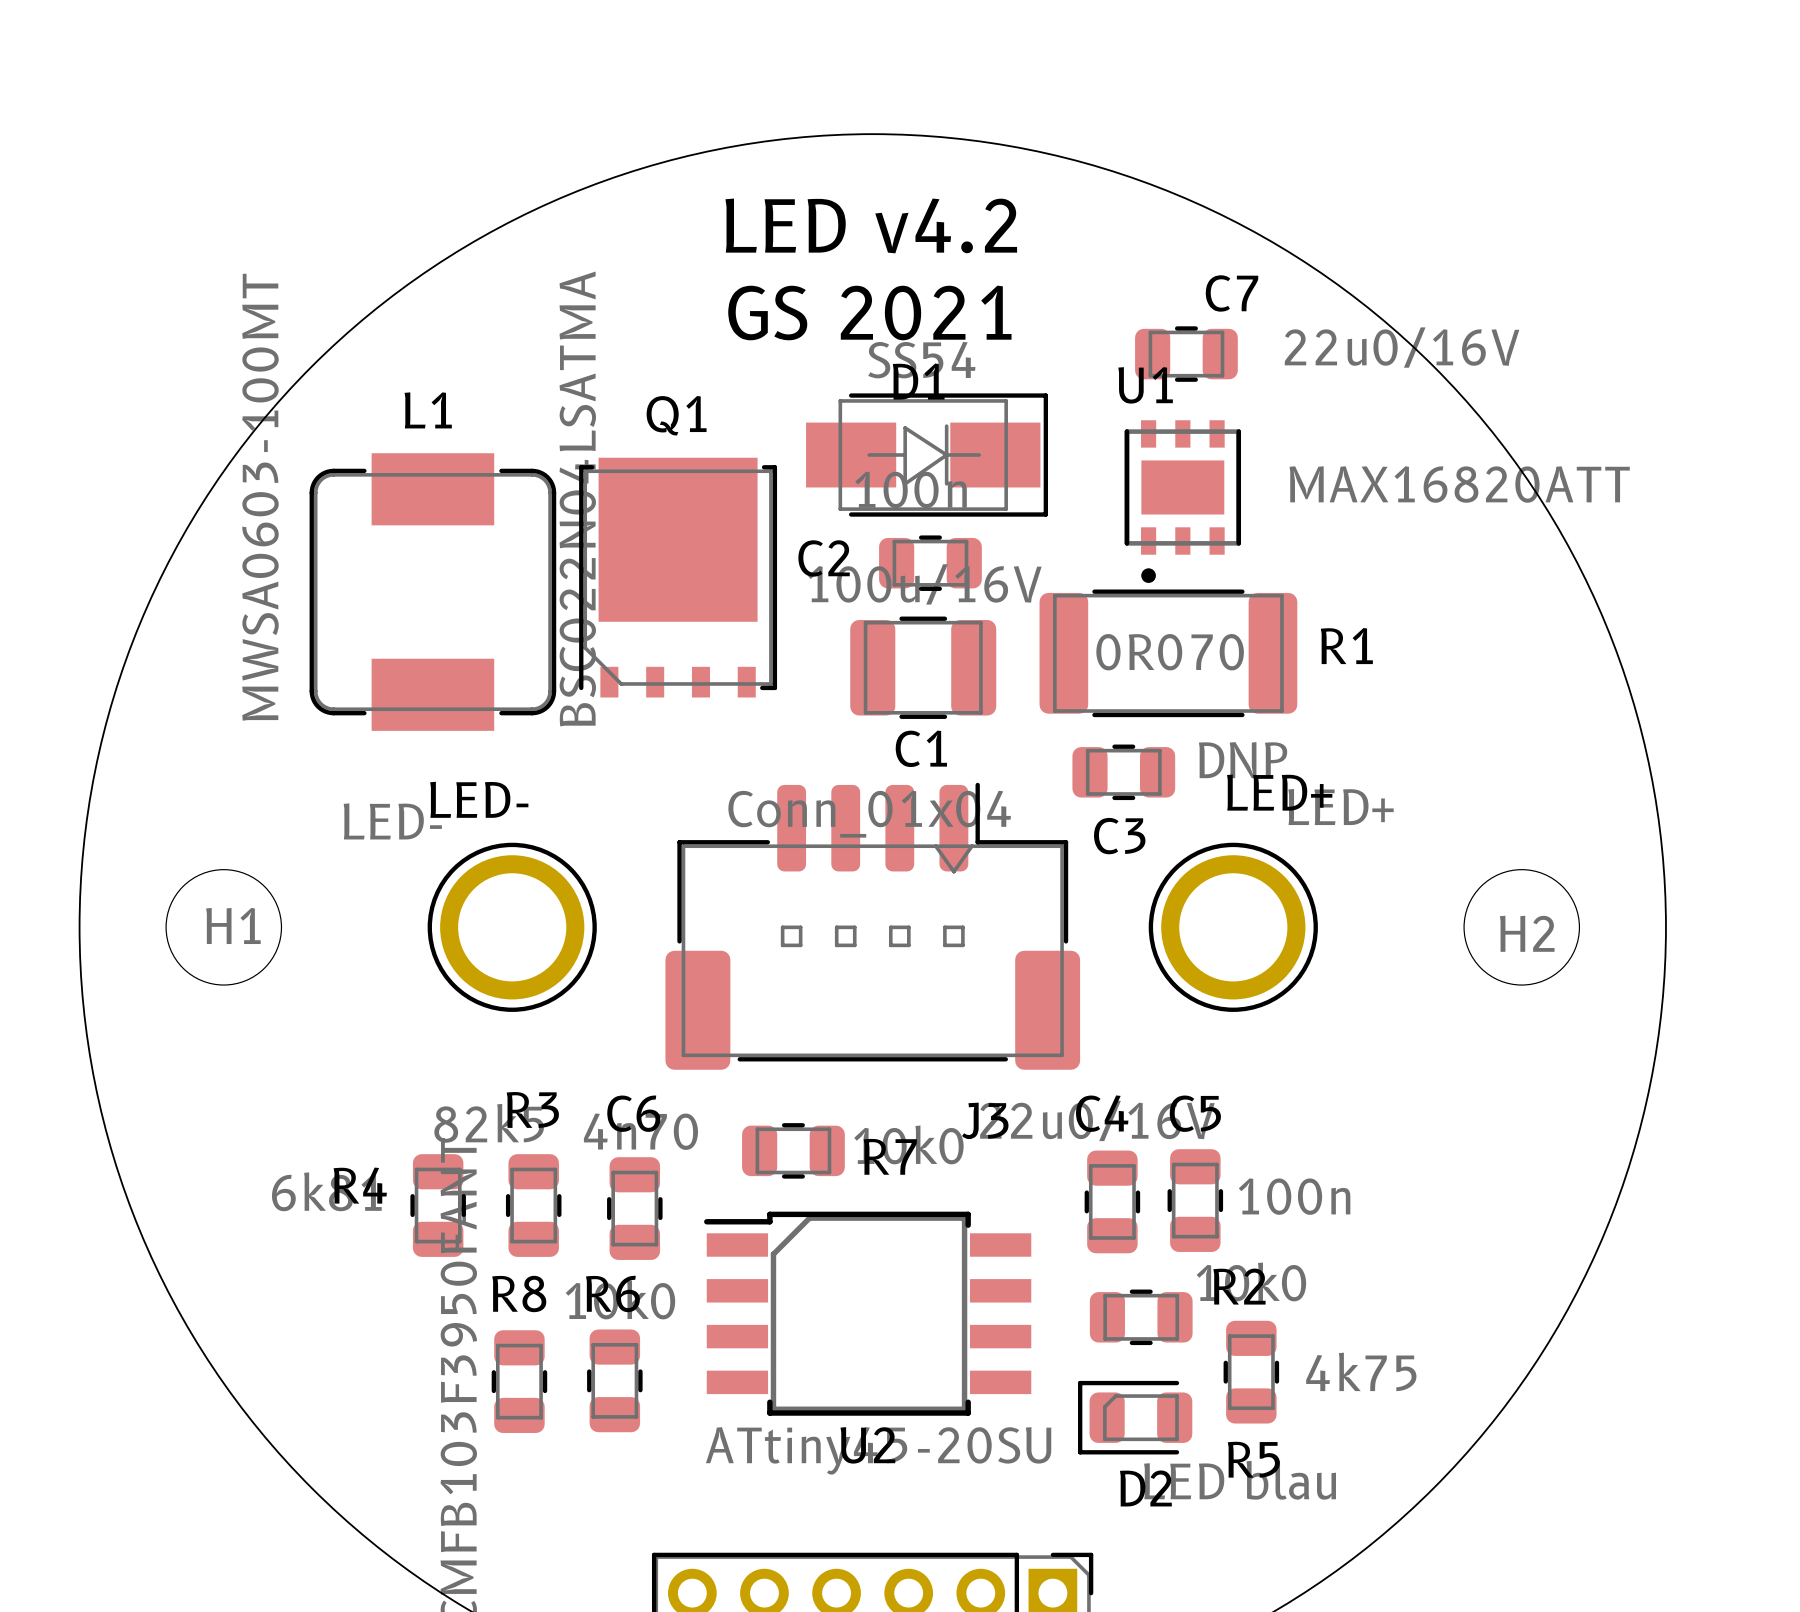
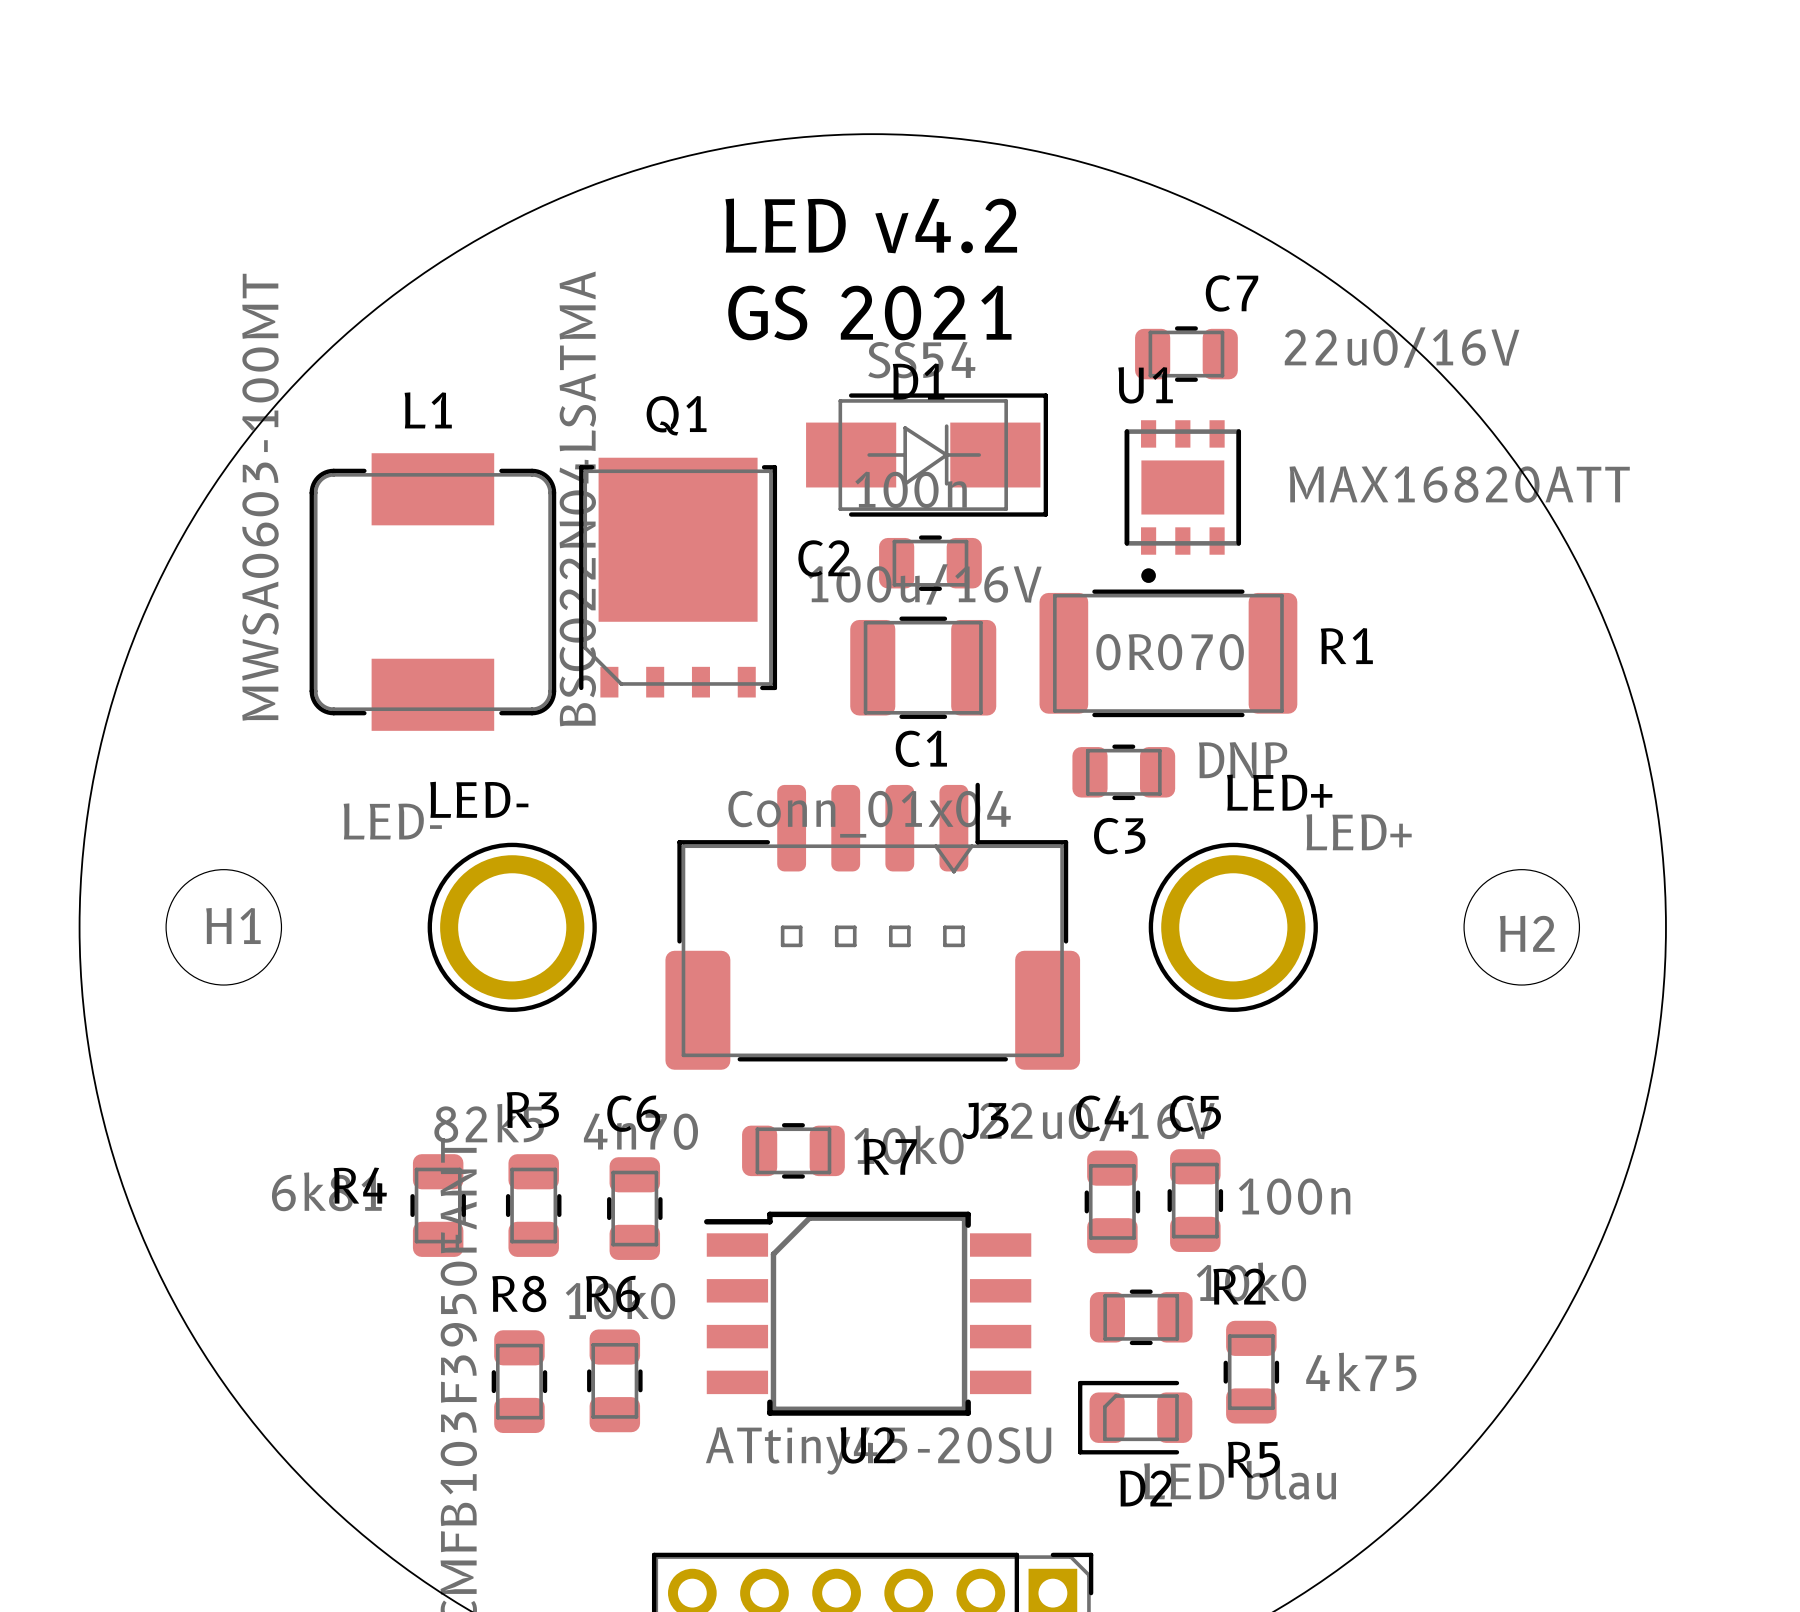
LED+ value position: LED+ (1341, 807) -> LED+ (1359, 832)

